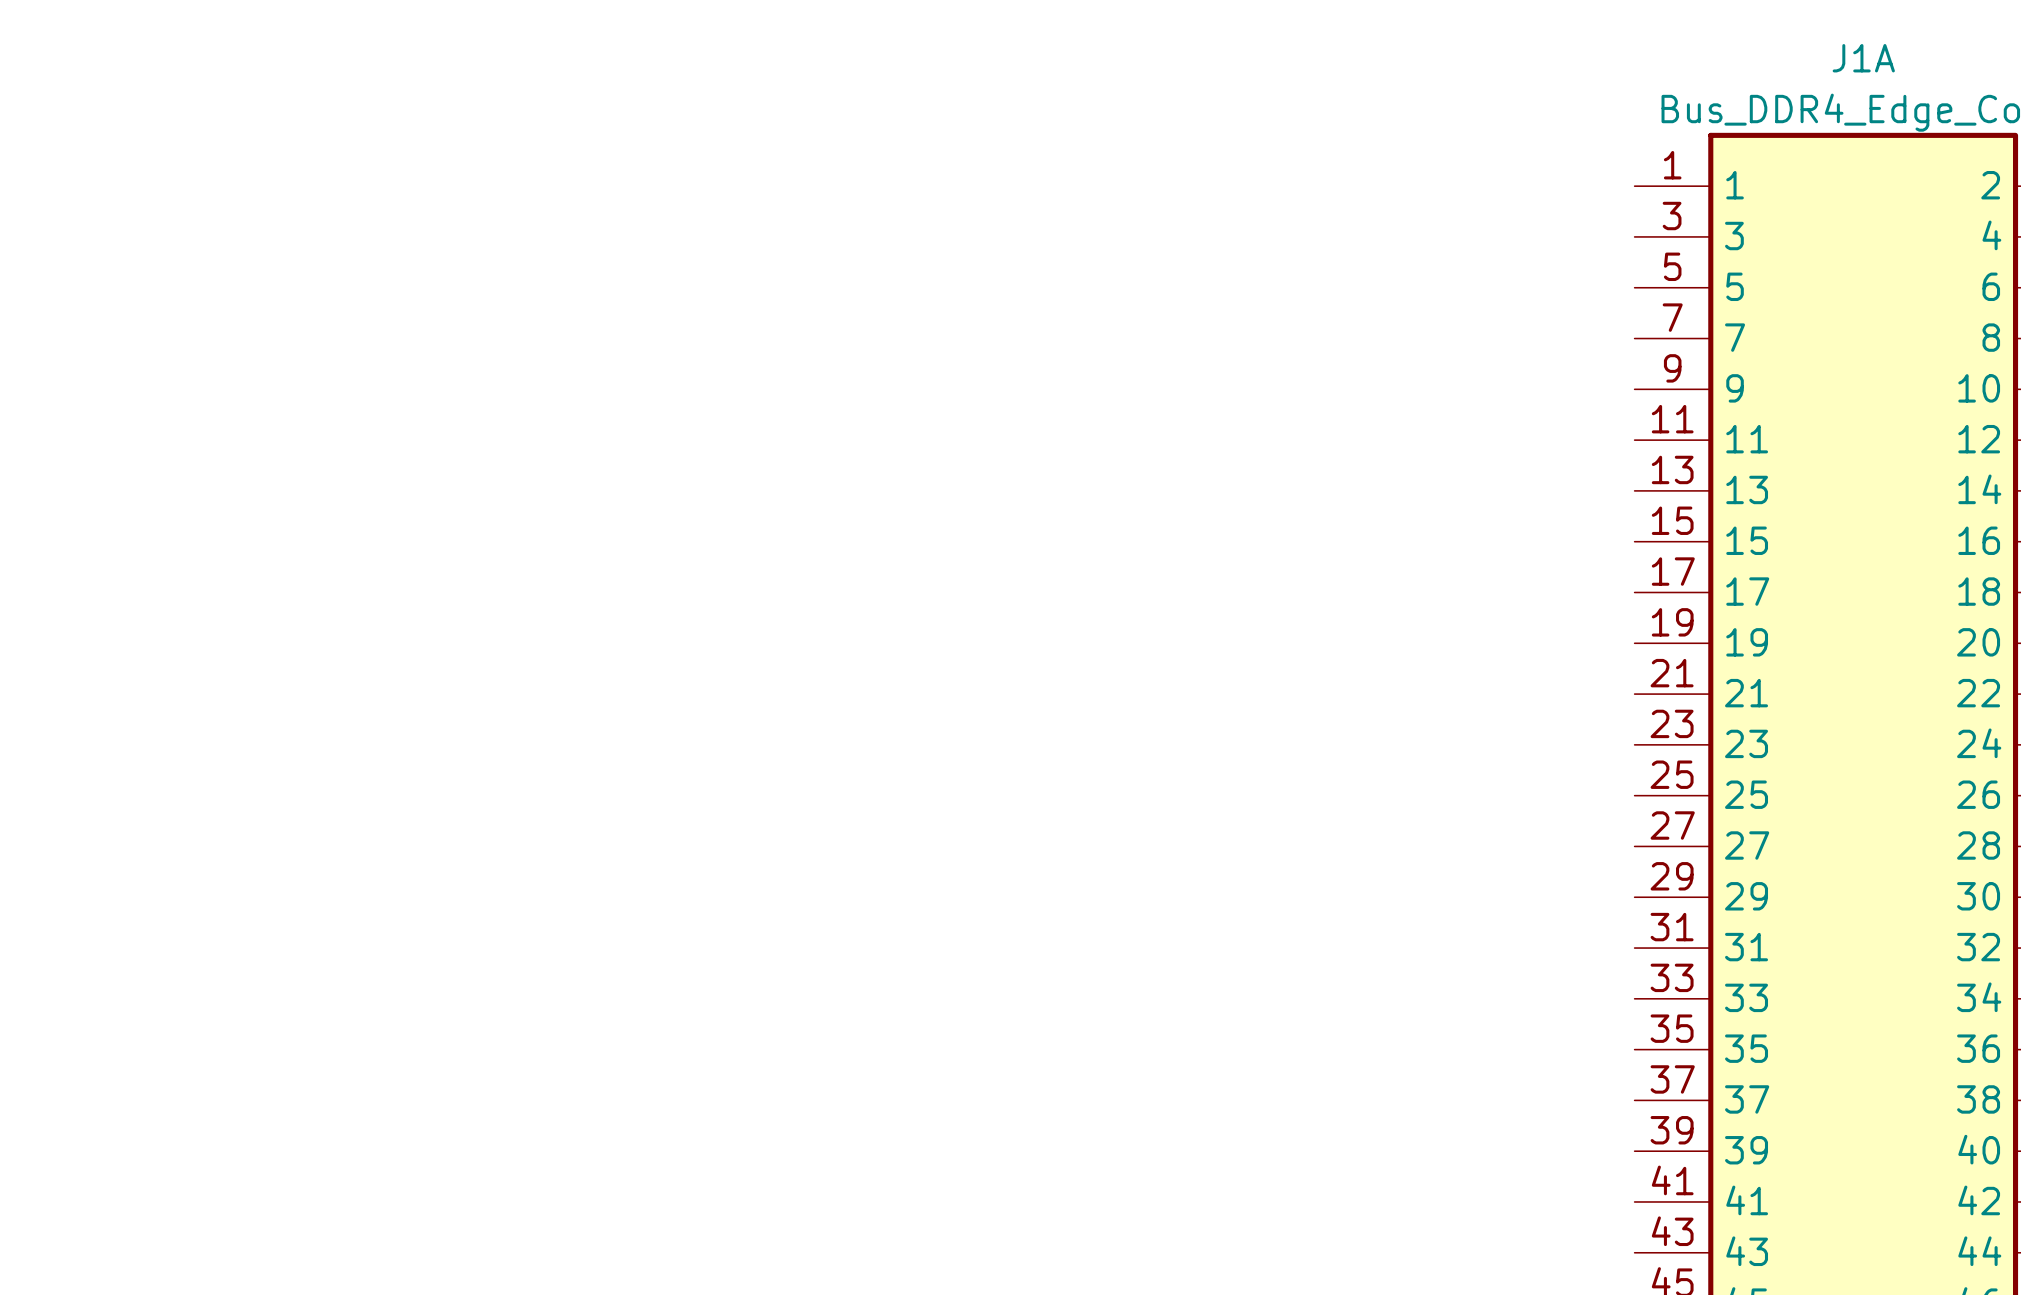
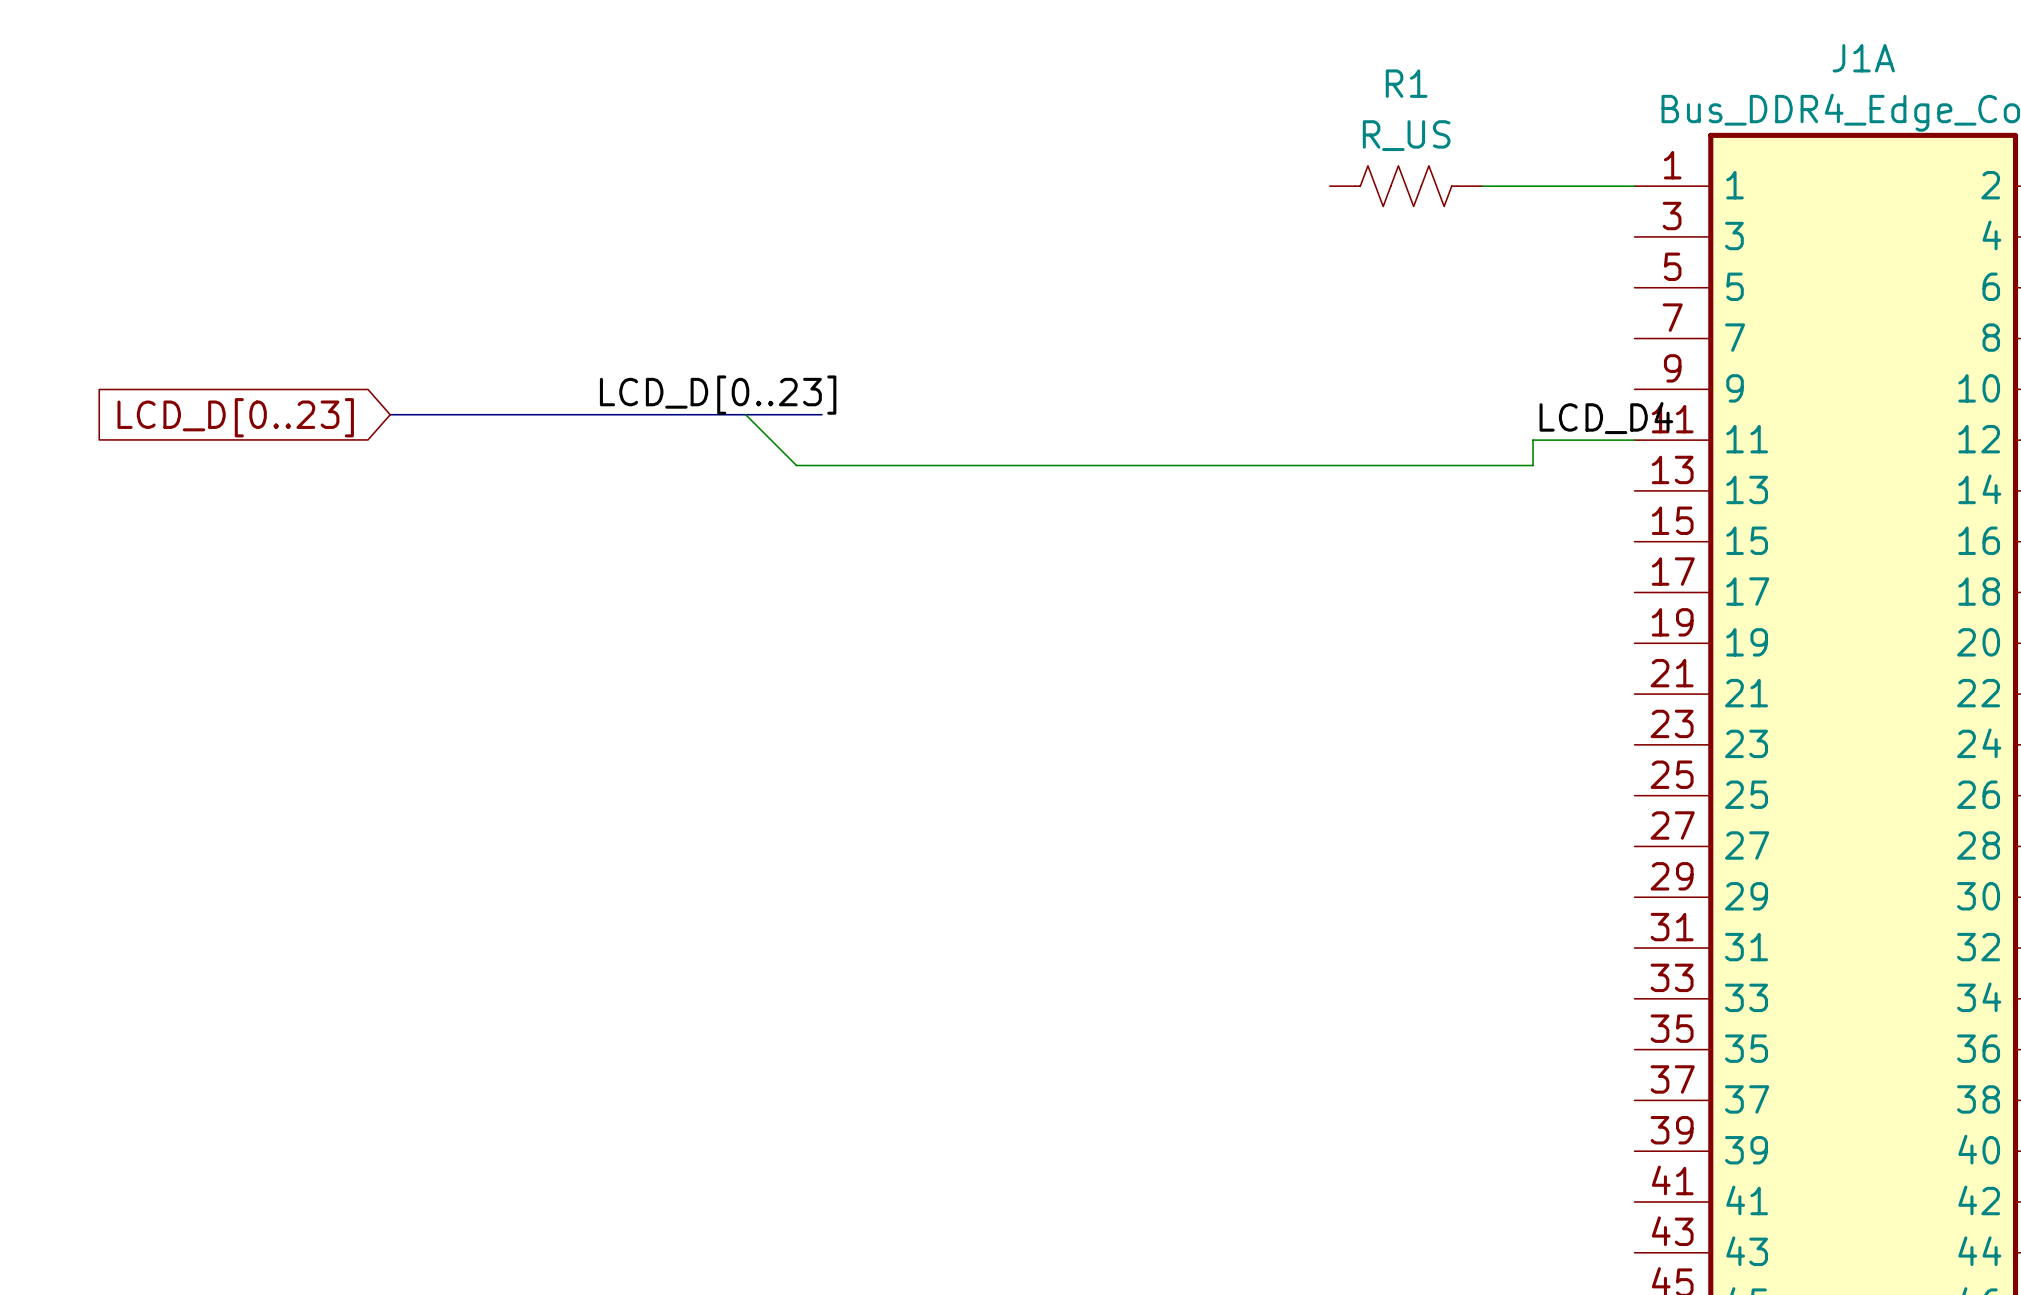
R1: none -> R_US (1406, 186)
wire: none -> (1482, 186) (1634, 186)
label: none -> LCD_D[0..23] (718, 395)
bus: none -> (390, 414) (821, 414)
wire: none -> (745, 414) (796, 465) (1533, 465) (1533, 440) (1634, 440)
global label: none -> LCD_D[0..23] (235, 417)
label: none -> LCD_D4 (1606, 418)

